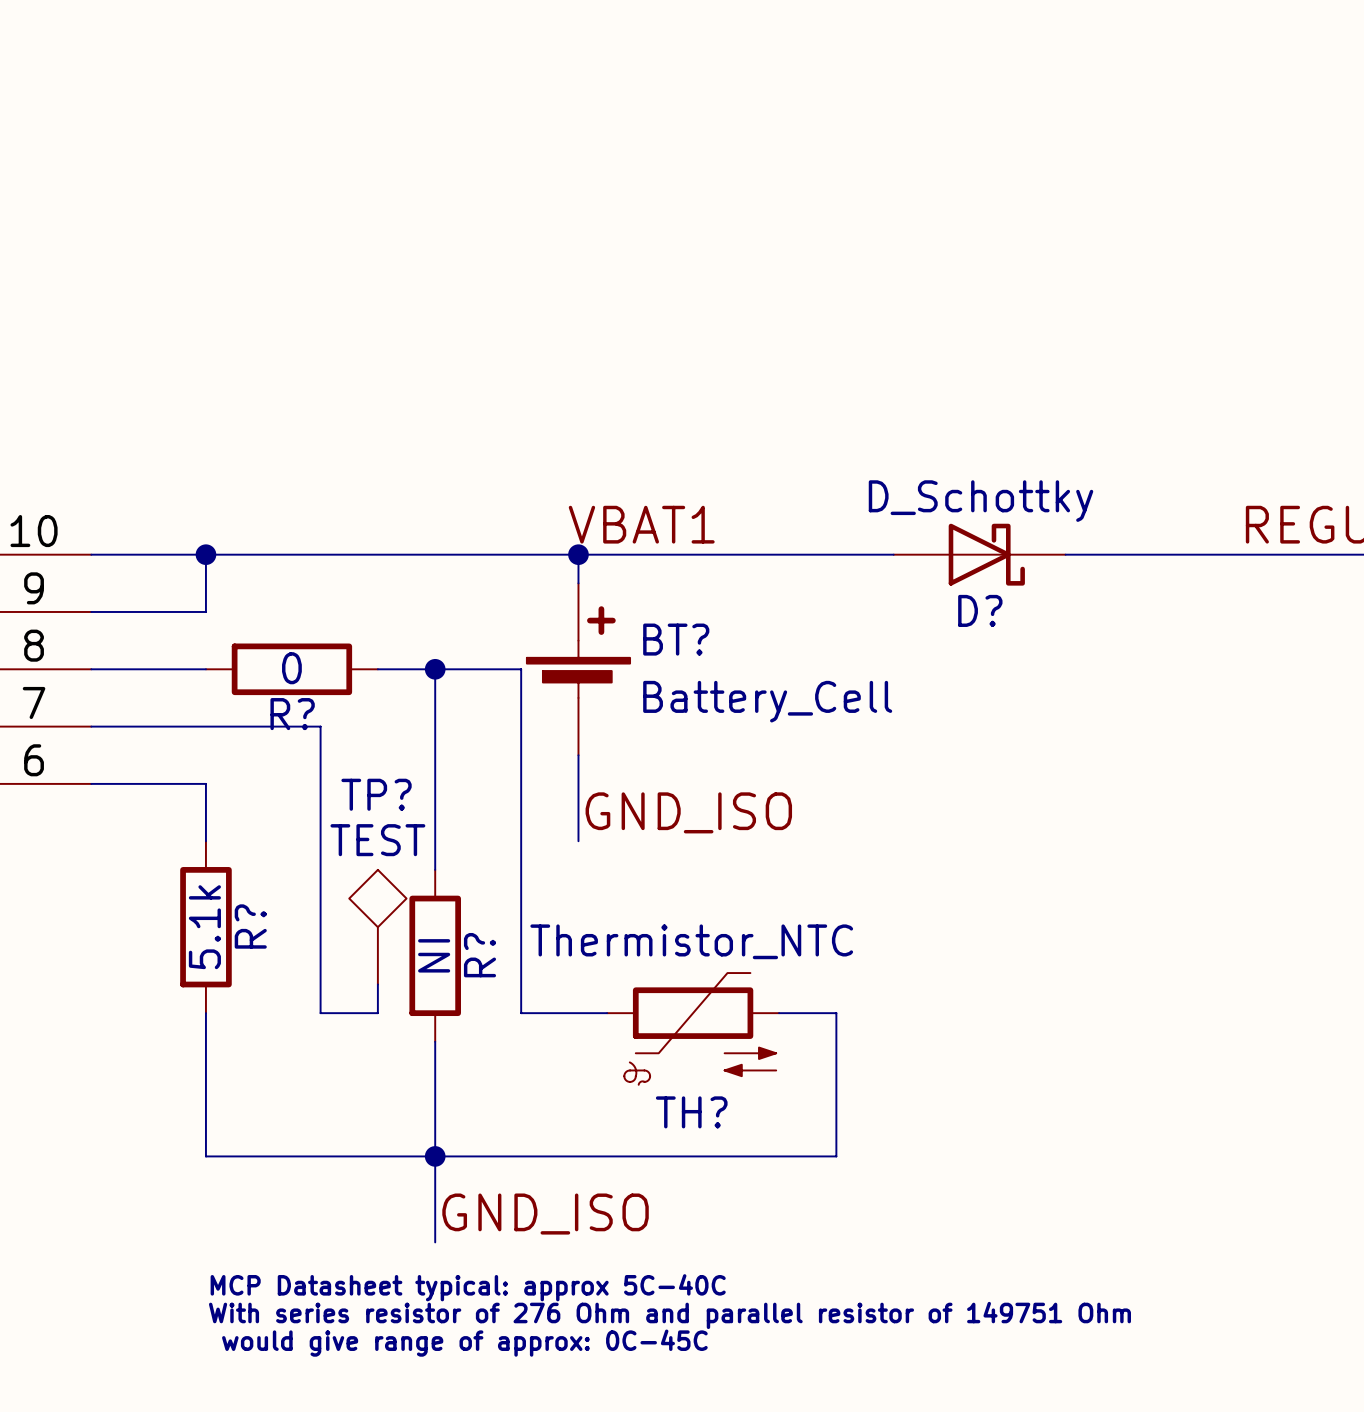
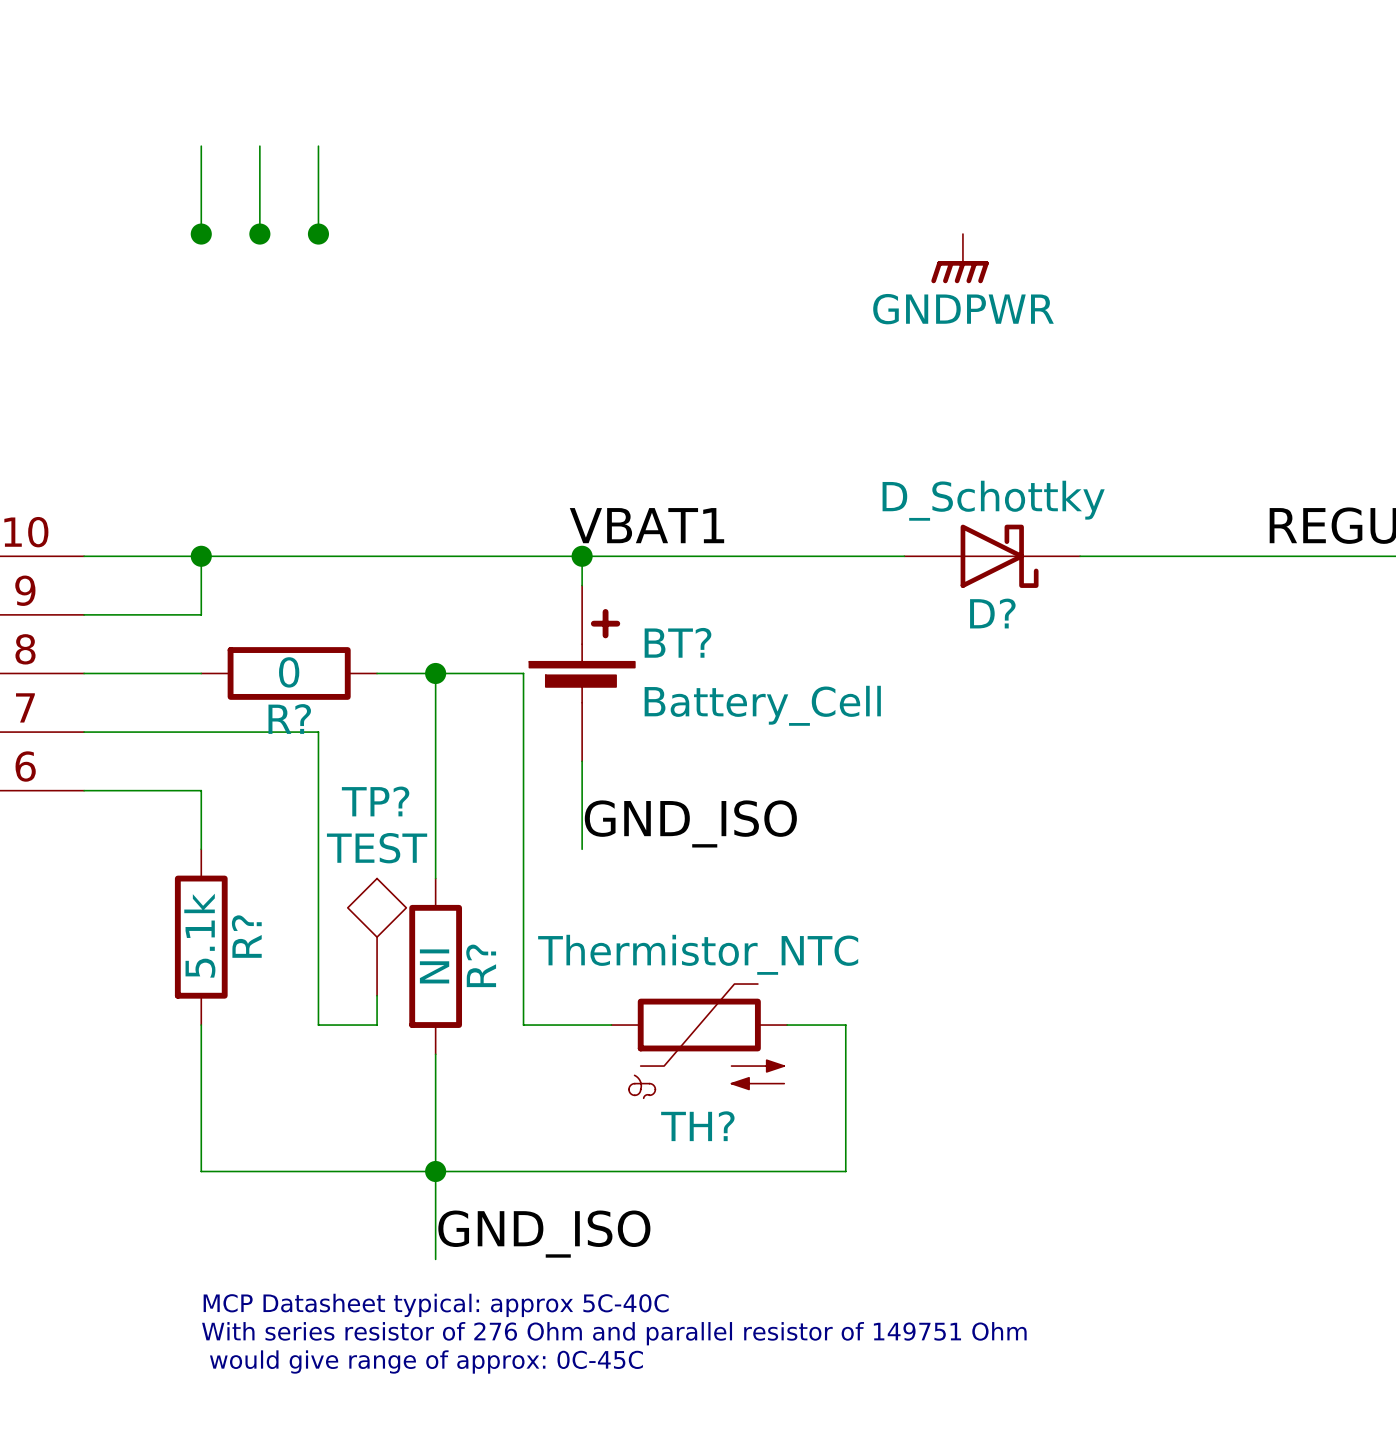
wire: none -> (201, 146) (201, 234)
wire: none -> (259, 146) (259, 234)
wire: none -> (318, 146) (318, 234)
junction: none -> (201, 234)
junction: none -> (259, 234)
junction: none -> (318, 234)
power symbol: none -> GNDPWR (960, 258)

